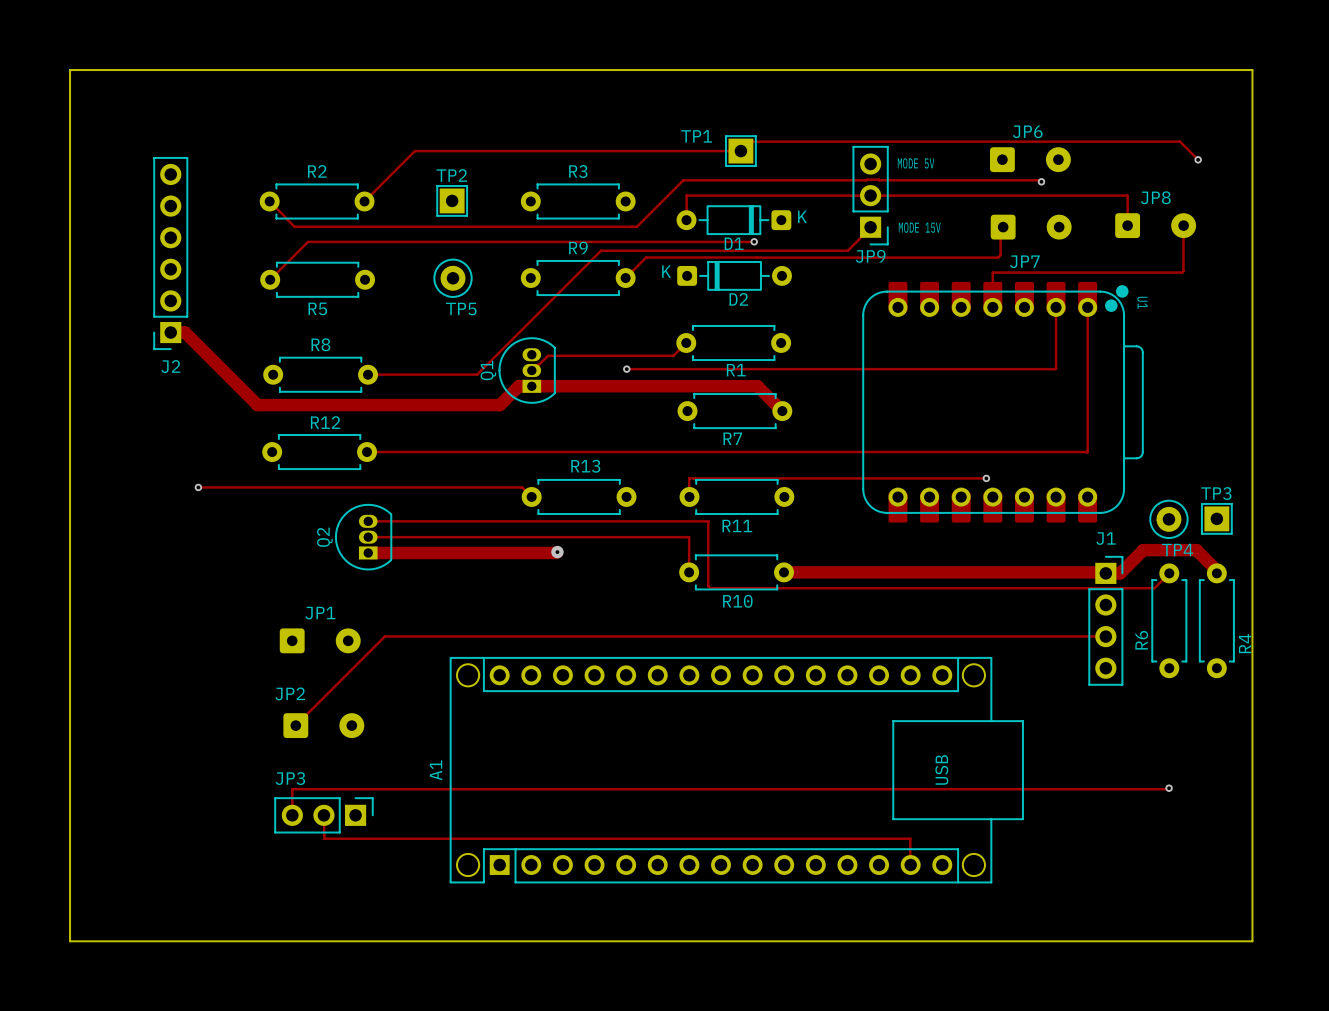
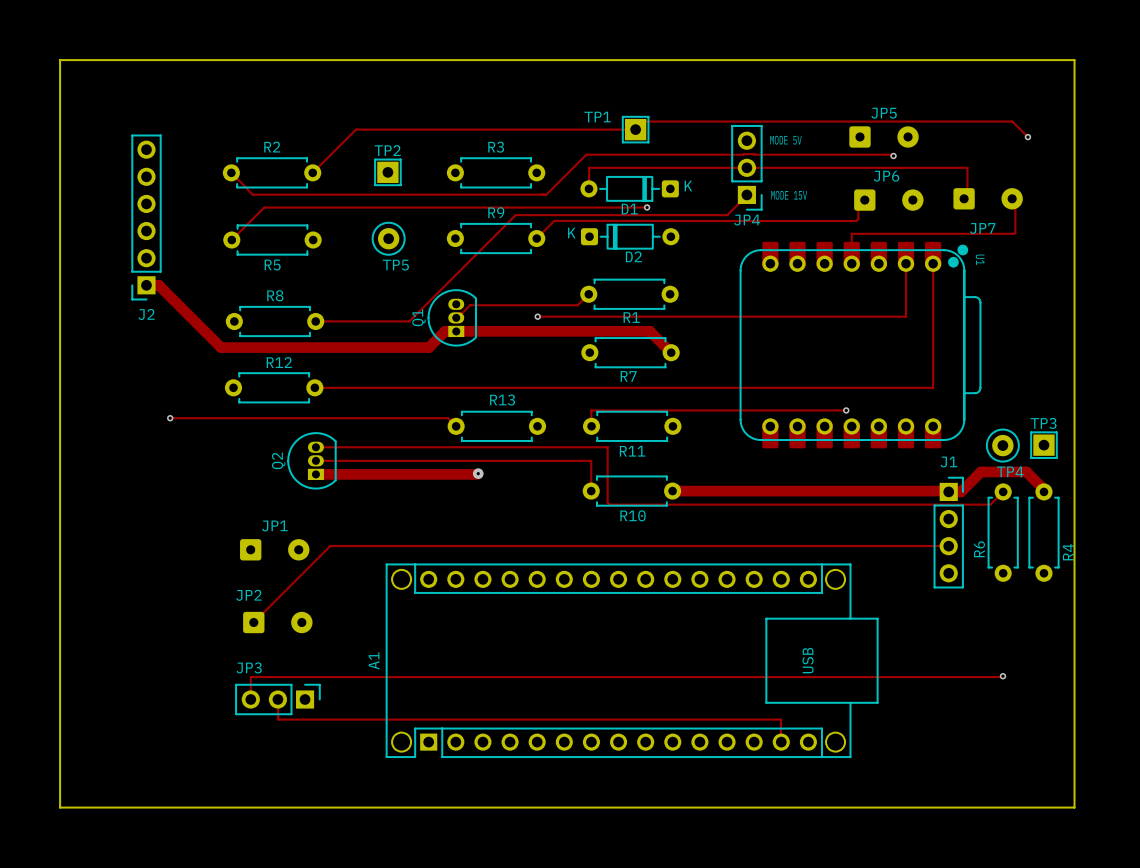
JP6 name: JP6 (1027, 131) -> JP5 (884, 113)
JP8: (1155, 225) -> none
JP7 position: (1031, 227) -> (988, 198)
JP6: none -> (888, 200)
JP9 name: JP9 (870, 256) -> JP4 (747, 220)

